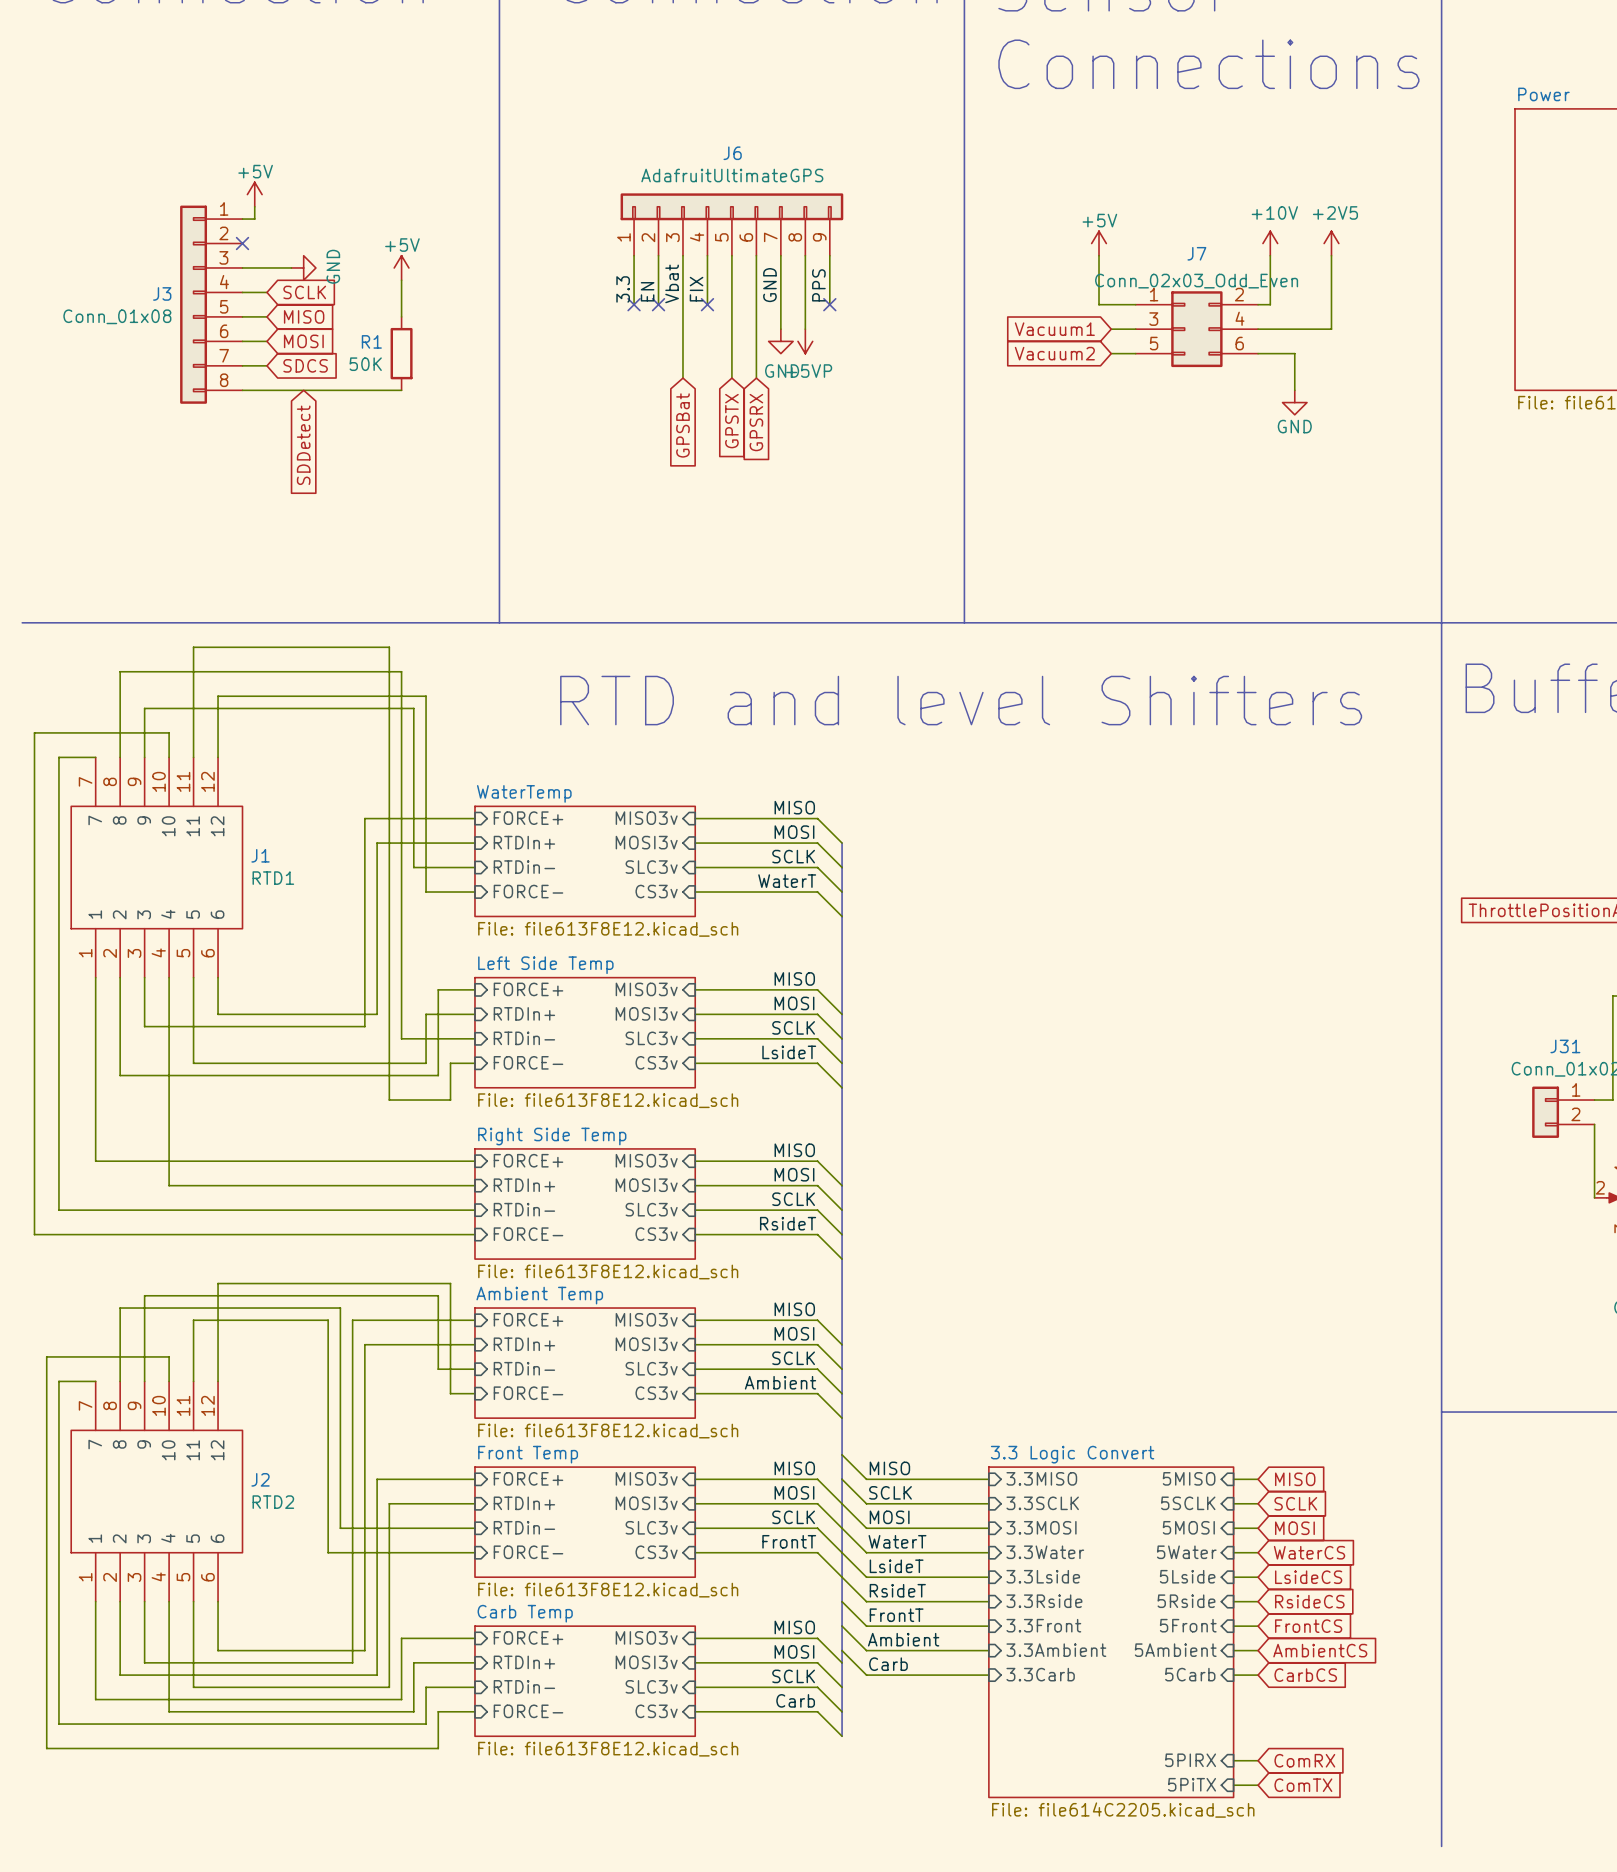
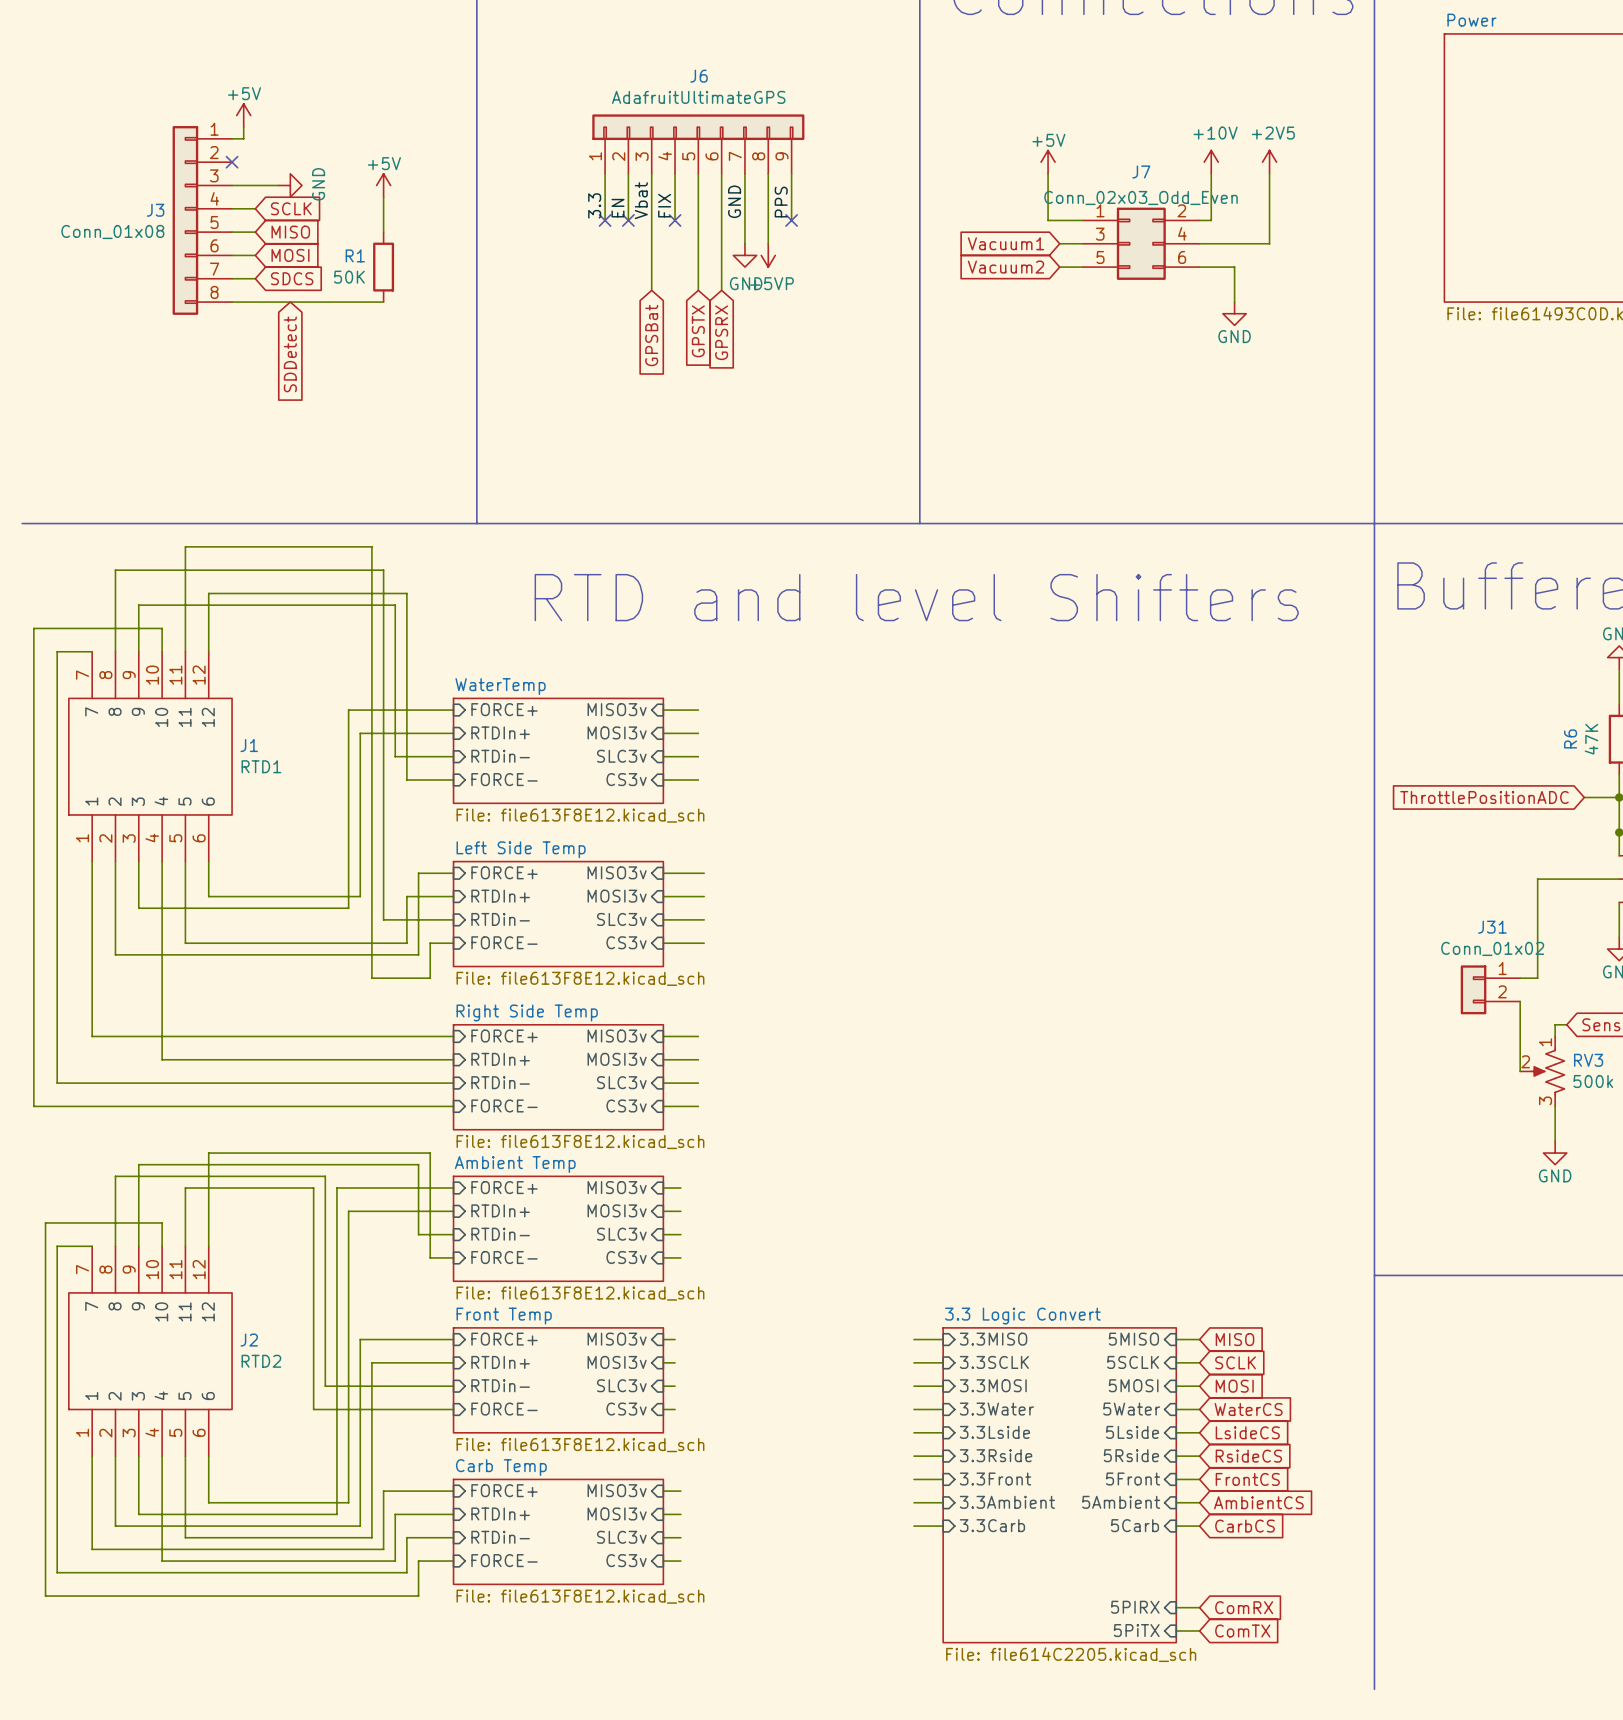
label: MISO (794, 807) -> none
wire: (731, 818) (817, 818) (842, 843) -> none
label: MOSI (794, 832) -> none
wire: (731, 843) (817, 843) (842, 867) -> none
bus: (842, 843) (842, 1736) -> none
label: SCLK (793, 856) -> none
wire: (731, 867) (817, 867) (842, 892) -> none
label: WaterT (787, 881) -> none
wire: (731, 892) (817, 892) (842, 916) -> none
label: MISO (794, 978) -> none
wire: (738, 989) (817, 989) (842, 1014) -> none
label: MOSI (794, 1003) -> none
wire: (738, 1014) (817, 1014) (842, 1038) -> none
label: SCLK (793, 1027) -> none
wire: (738, 1038) (817, 1038) (842, 1063) -> none
label: LsideT (789, 1052) -> none
wire: (738, 1063) (817, 1063) (842, 1087) -> none
label: MISO (794, 1150) -> none
wire: (731, 1161) (817, 1161) (842, 1185) -> none
label: MOSI (794, 1174) -> none
wire: (731, 1185) (817, 1185) (842, 1210) -> none
label: SCLK (793, 1199) -> none
wire: (731, 1210) (817, 1210) (842, 1234) -> none
label: RsideT (788, 1223) -> none
wire: (731, 1234) (817, 1234) (842, 1259) -> none
label: MISO (794, 1309) -> none
wire: (713, 1320) (817, 1320) (842, 1344) -> none
label: MOSI (794, 1333) -> none
wire: (713, 1344) (817, 1344) (842, 1369) -> none
label: SCLK (793, 1358) -> none
wire: (713, 1369) (817, 1369) (842, 1393) -> none
label: Ambient (780, 1382) -> none
wire: (713, 1393) (817, 1393) (842, 1418) -> none
wire: (842, 1454) (866, 1479) (958, 1479) -> none
label: MISO (794, 1468) -> none
label: MISO (889, 1468) -> none
wire: (707, 1479) (817, 1479) (866, 1528) (958, 1528) -> none
wire: (842, 1479) (866, 1503) (958, 1503) -> none
label: MOSI (794, 1492) -> none
label: SCLK (890, 1492) -> none
wire: (707, 1503) (817, 1503) (866, 1552) (958, 1552) -> none
label: SCLK (793, 1517) -> none
label: MOSI (889, 1517) -> none
wire: (707, 1528) (817, 1528) (866, 1577) (958, 1577) -> none
label: FrontT (789, 1541) -> none
label: WaterT (897, 1541) -> none
wire: (707, 1552) (817, 1552) (866, 1601) (958, 1601) -> none
label: LsideT (896, 1566) -> none
label: RsideT (897, 1590) -> none
wire: (842, 1601) (866, 1626) (958, 1626) -> none
label: FrontT (896, 1615) -> none
wire: (842, 1626) (866, 1650) (958, 1650) -> none
label: MISO (794, 1627) -> none
wire: (713, 1638) (817, 1638) (842, 1662) -> none
label: Ambient (903, 1639) -> none
wire: (842, 1650) (866, 1675) (958, 1675) -> none
label: MOSI (794, 1651) -> none
wire: (713, 1662) (817, 1662) (842, 1687) -> none
label: Carb (888, 1664) -> none
label: SCLK (793, 1676) -> none
wire: (713, 1687) (817, 1687) (842, 1711) -> none
label: Carb (795, 1700) -> none
wire: (713, 1711) (817, 1711) (842, 1736) -> none

